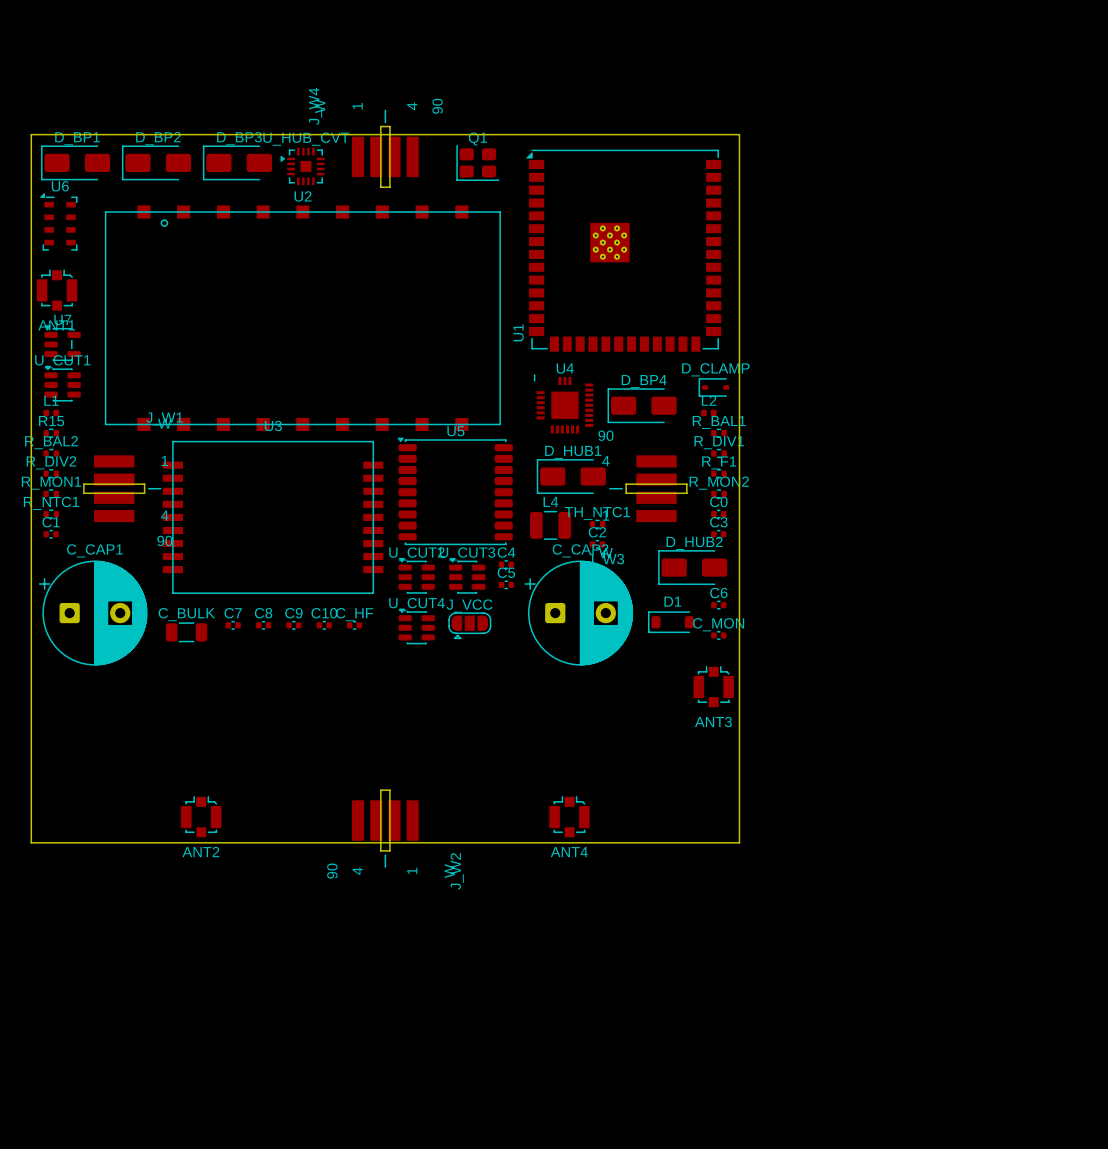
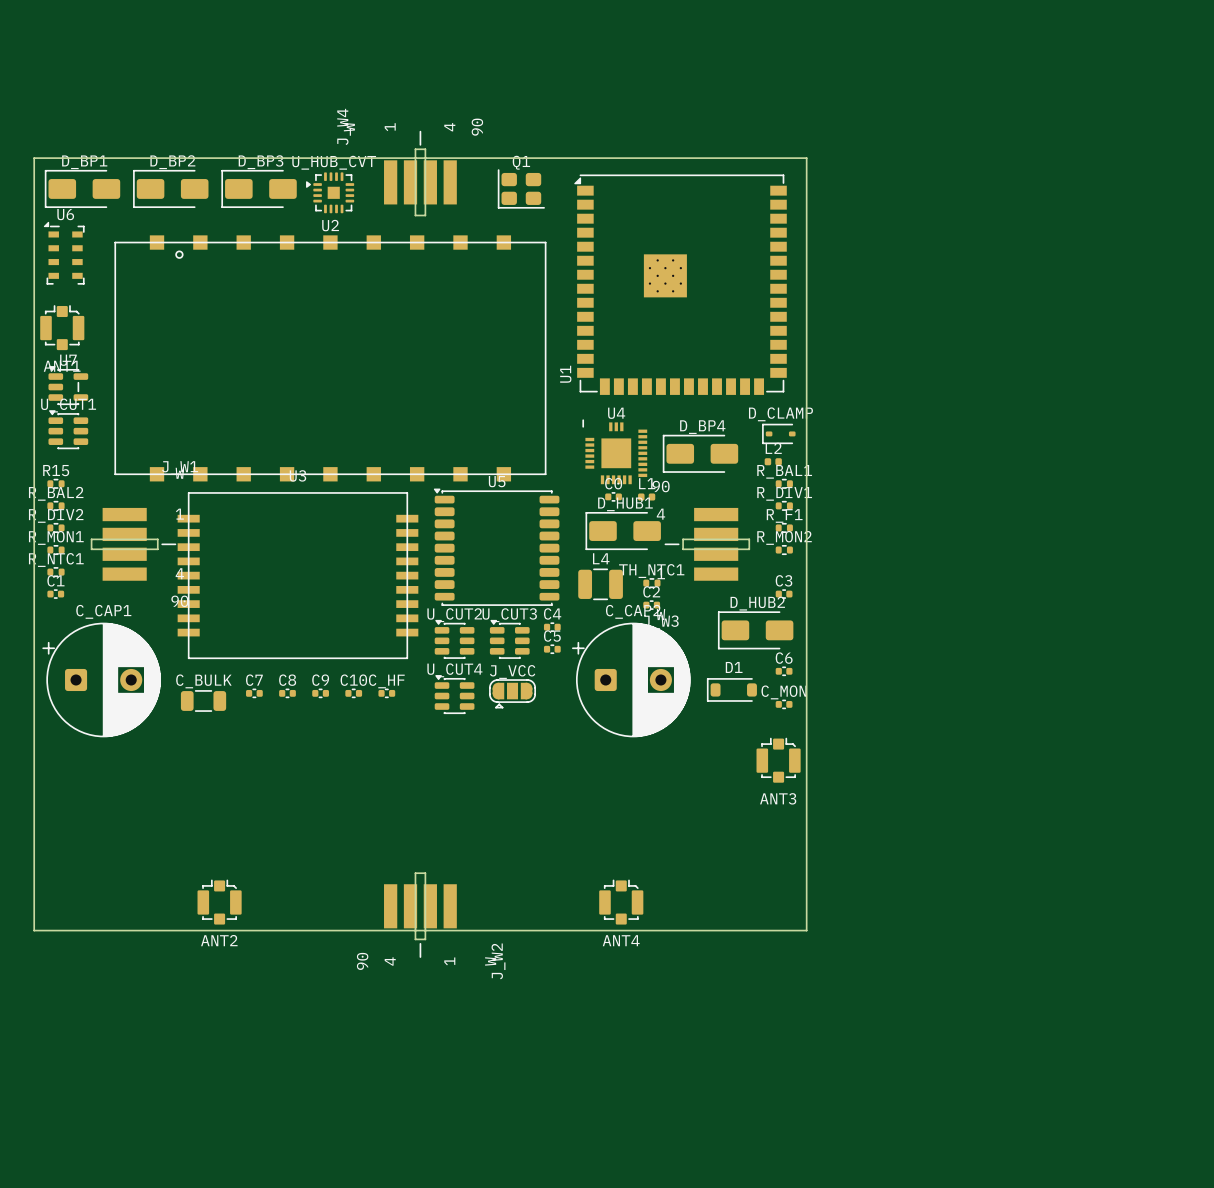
L1 position: (51, 413) -> (646, 497)
C0 position: (718, 514) -> (613, 496)

